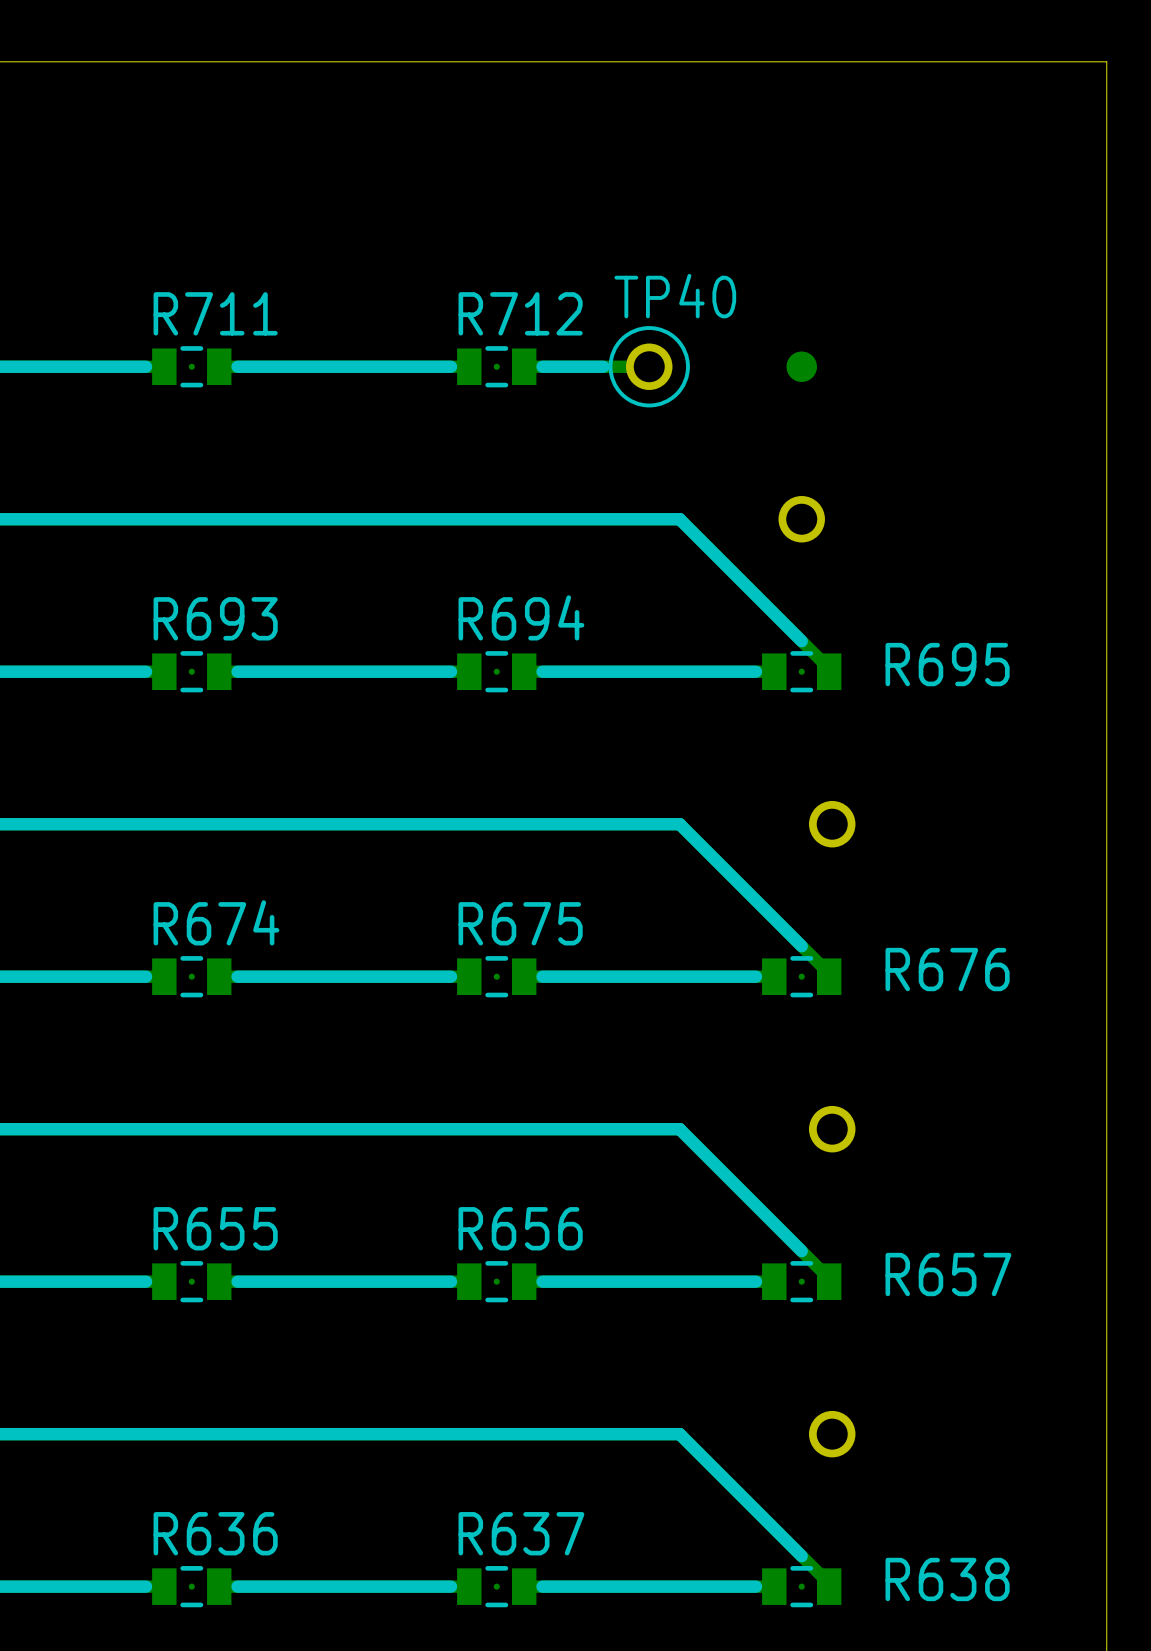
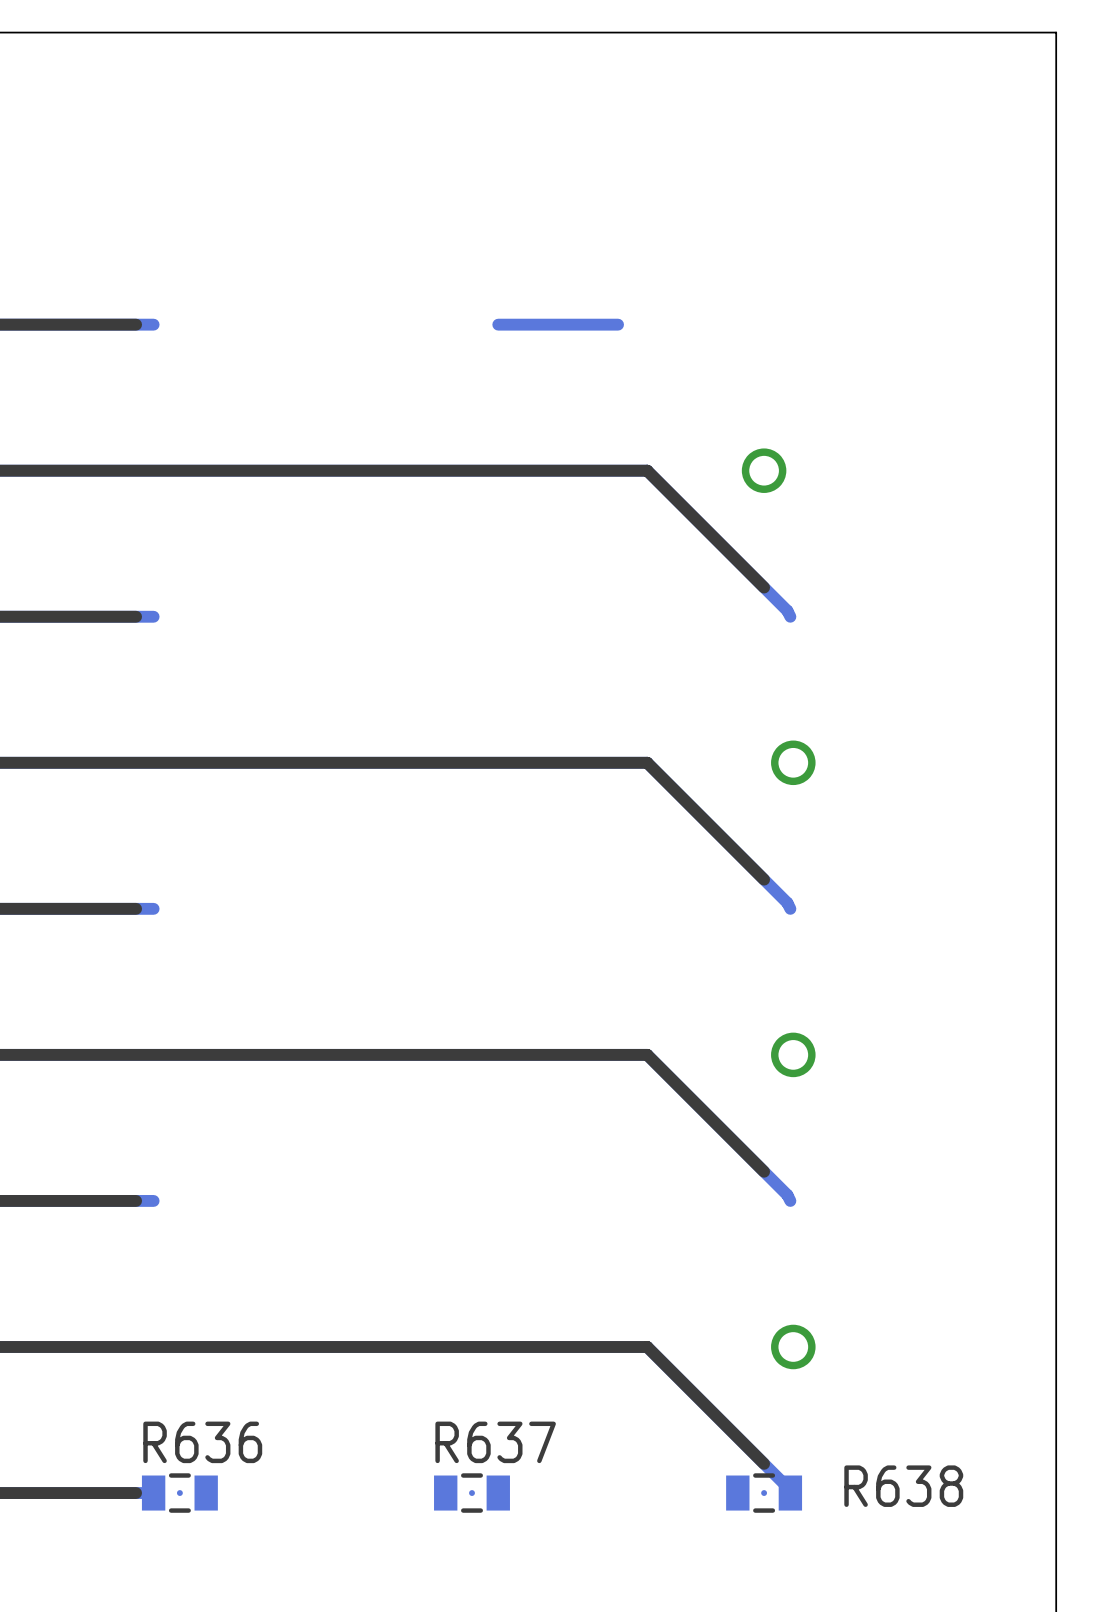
R711: (191, 366) -> none
line: (451, 366) (237, 366) -> none
R712: (496, 366) -> none
line: (603, 366) (542, 366) -> none
TP40: (649, 366) -> none
part: (801, 366) -> none
R693: (191, 671) -> none
line: (451, 671) (237, 671) -> none
R694: (496, 671) -> none
line: (755, 671) (542, 671) -> none
R695: (801, 671) -> none
R674: (191, 976) -> none
line: (451, 976) (237, 976) -> none
R675: (496, 976) -> none
line: (755, 976) (542, 976) -> none
R676: (801, 976) -> none
R655: (191, 1281) -> none
line: (451, 1281) (237, 1281) -> none
R656: (496, 1281) -> none
line: (755, 1281) (542, 1281) -> none
R657: (801, 1281) -> none
line: (451, 1586) (237, 1586) -> none
line: (755, 1586) (542, 1586) -> none

